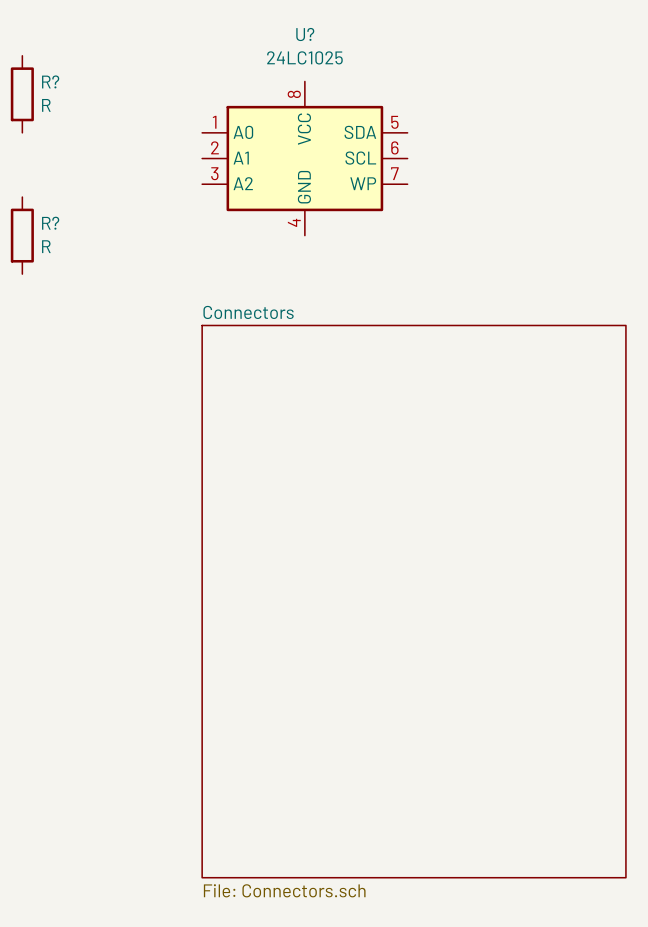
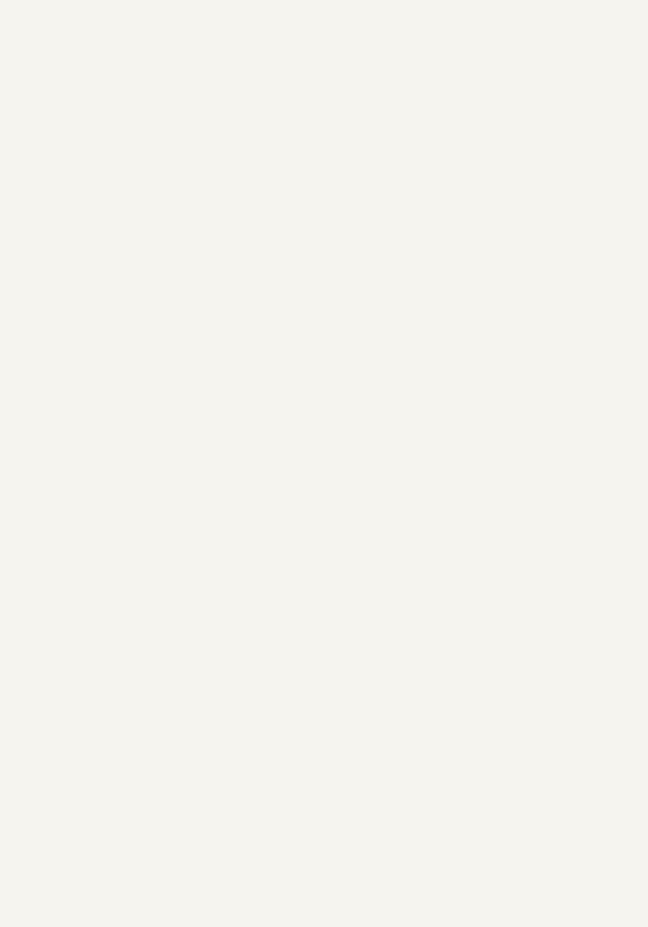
R?: R (22, 94) -> none
U?: 24LC1025 (304, 158) -> none
R?: R (22, 235) -> none
sheet Connectors: File: Connectors.sch (414, 601) -> none

